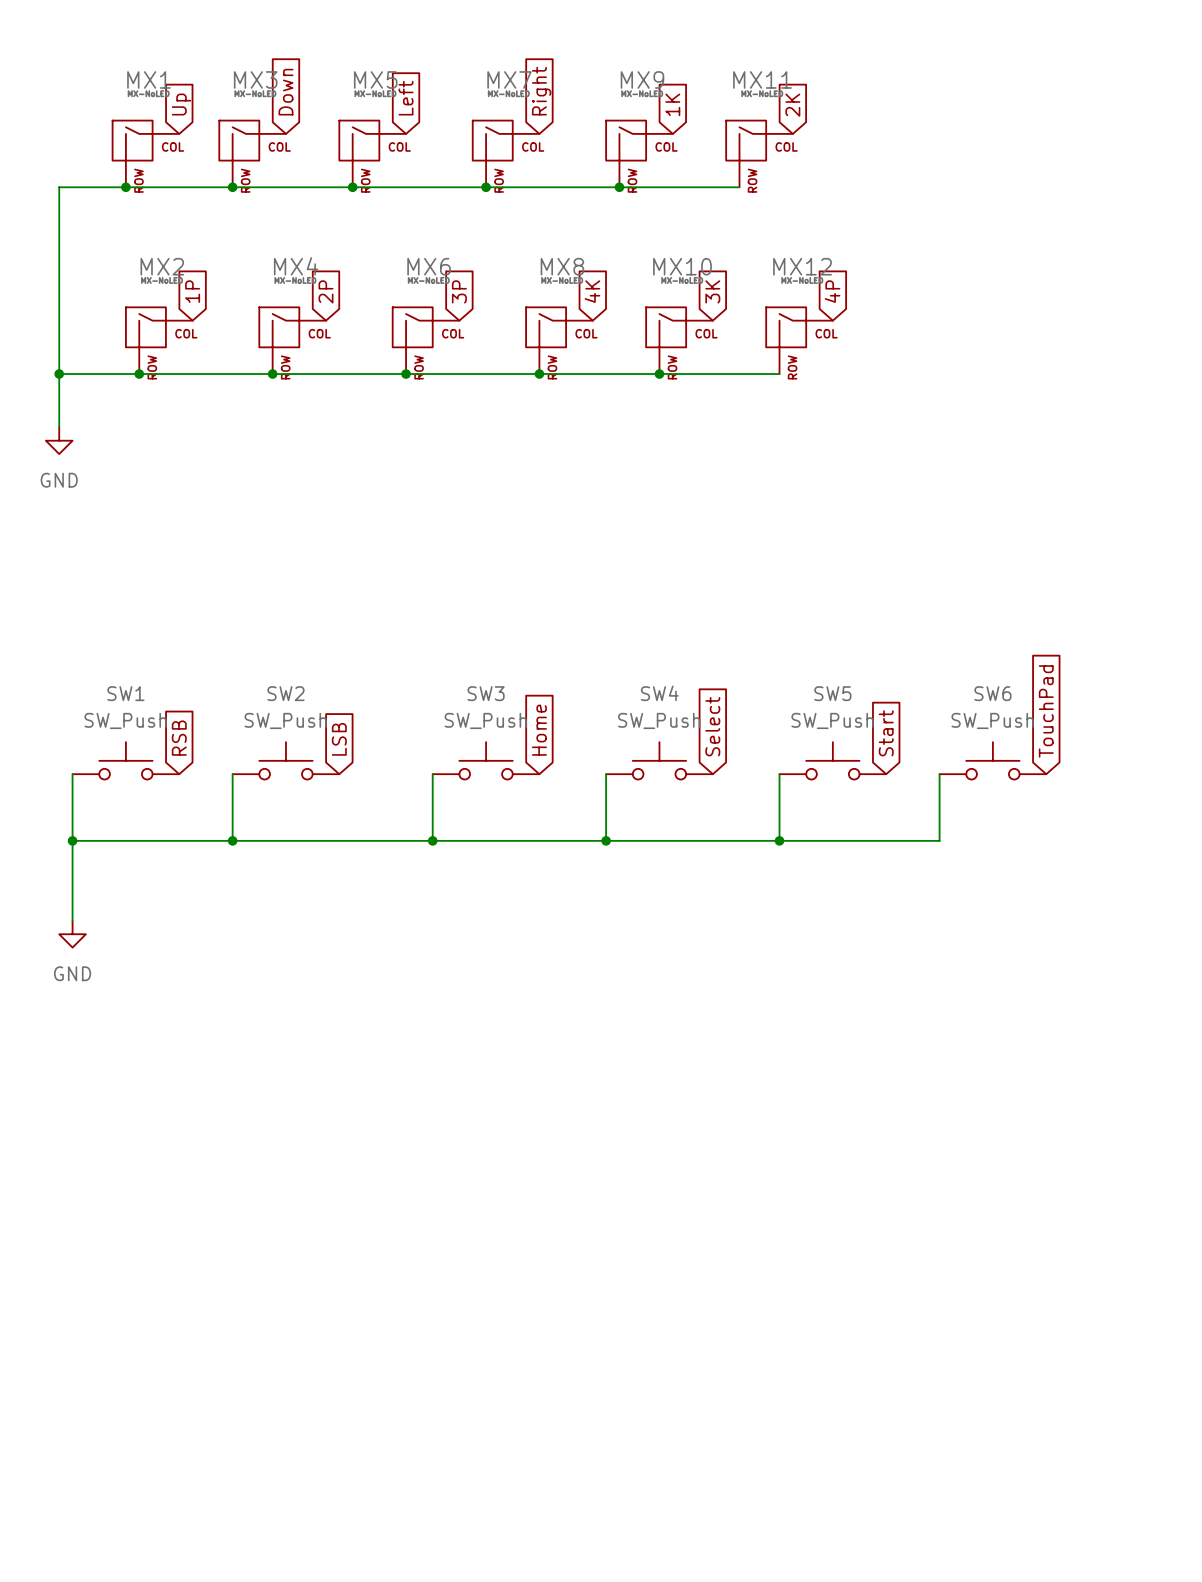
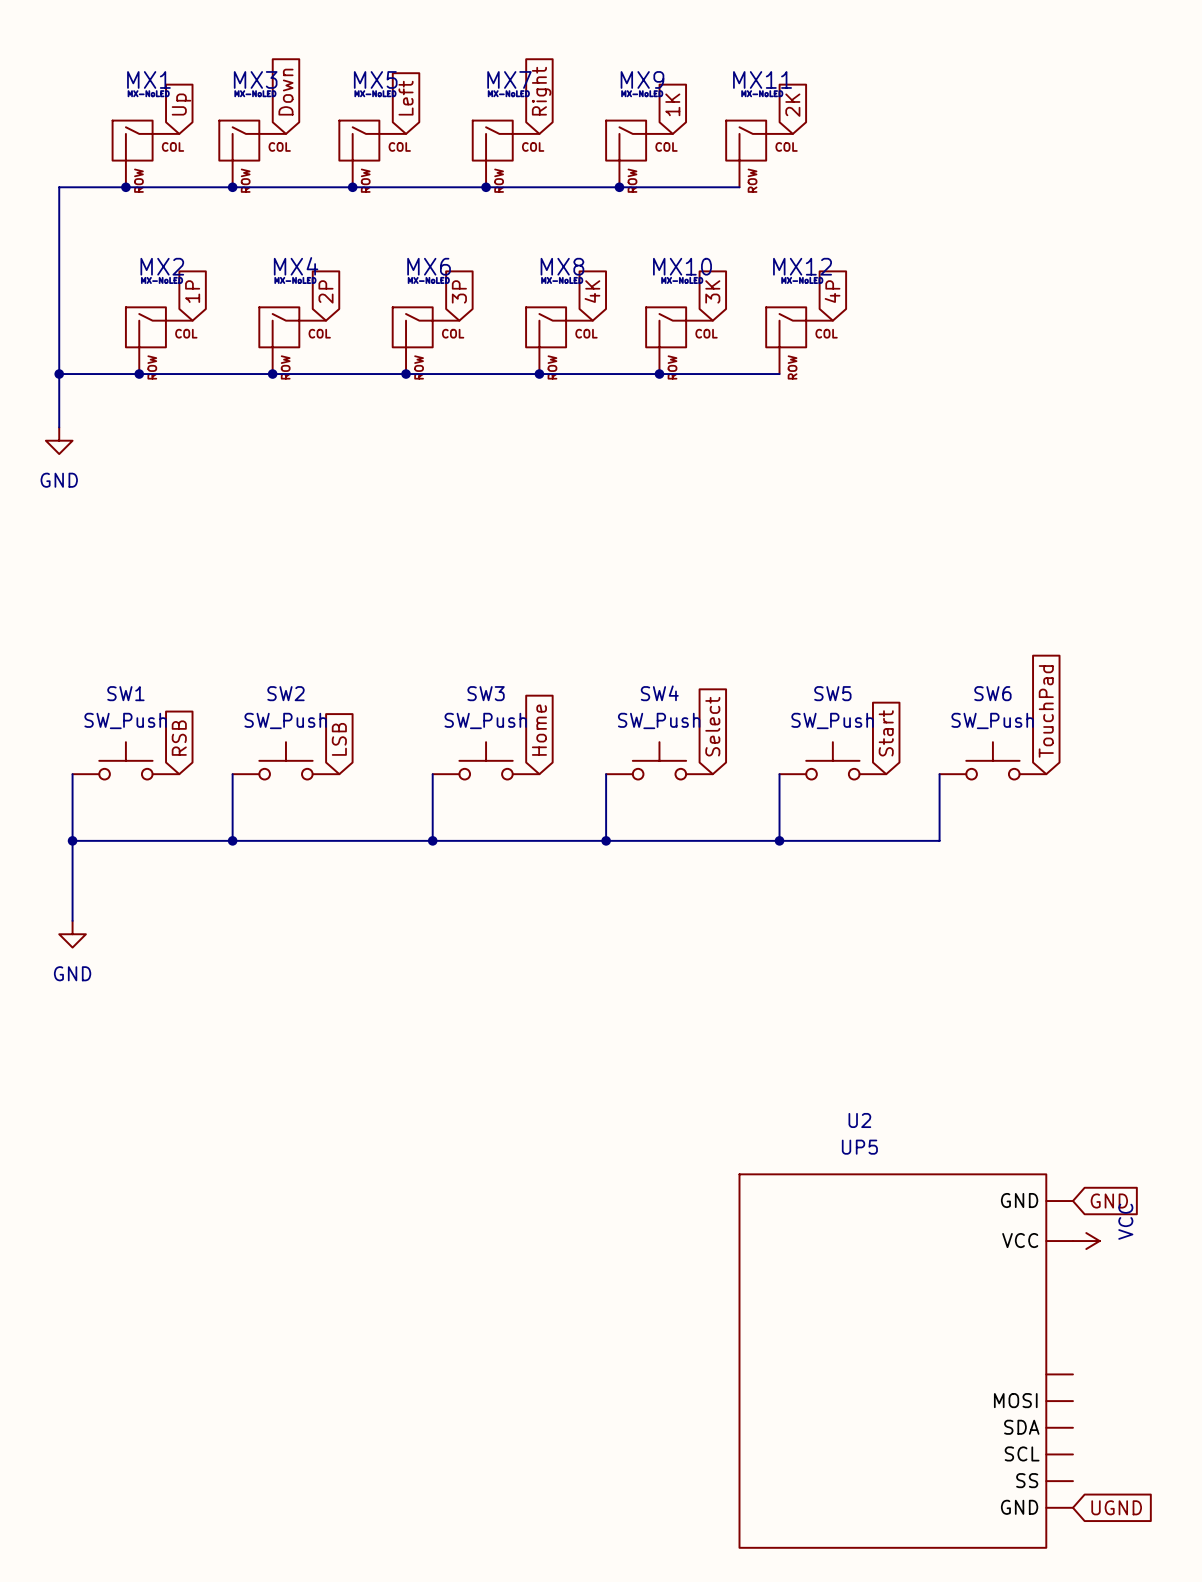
global label: none -> GND (1109, 1201)
power symbol: none -> VCC (1086, 1241)
U2: none -> UP5 (872, 1361)
global label: none -> UGND (1116, 1507)

